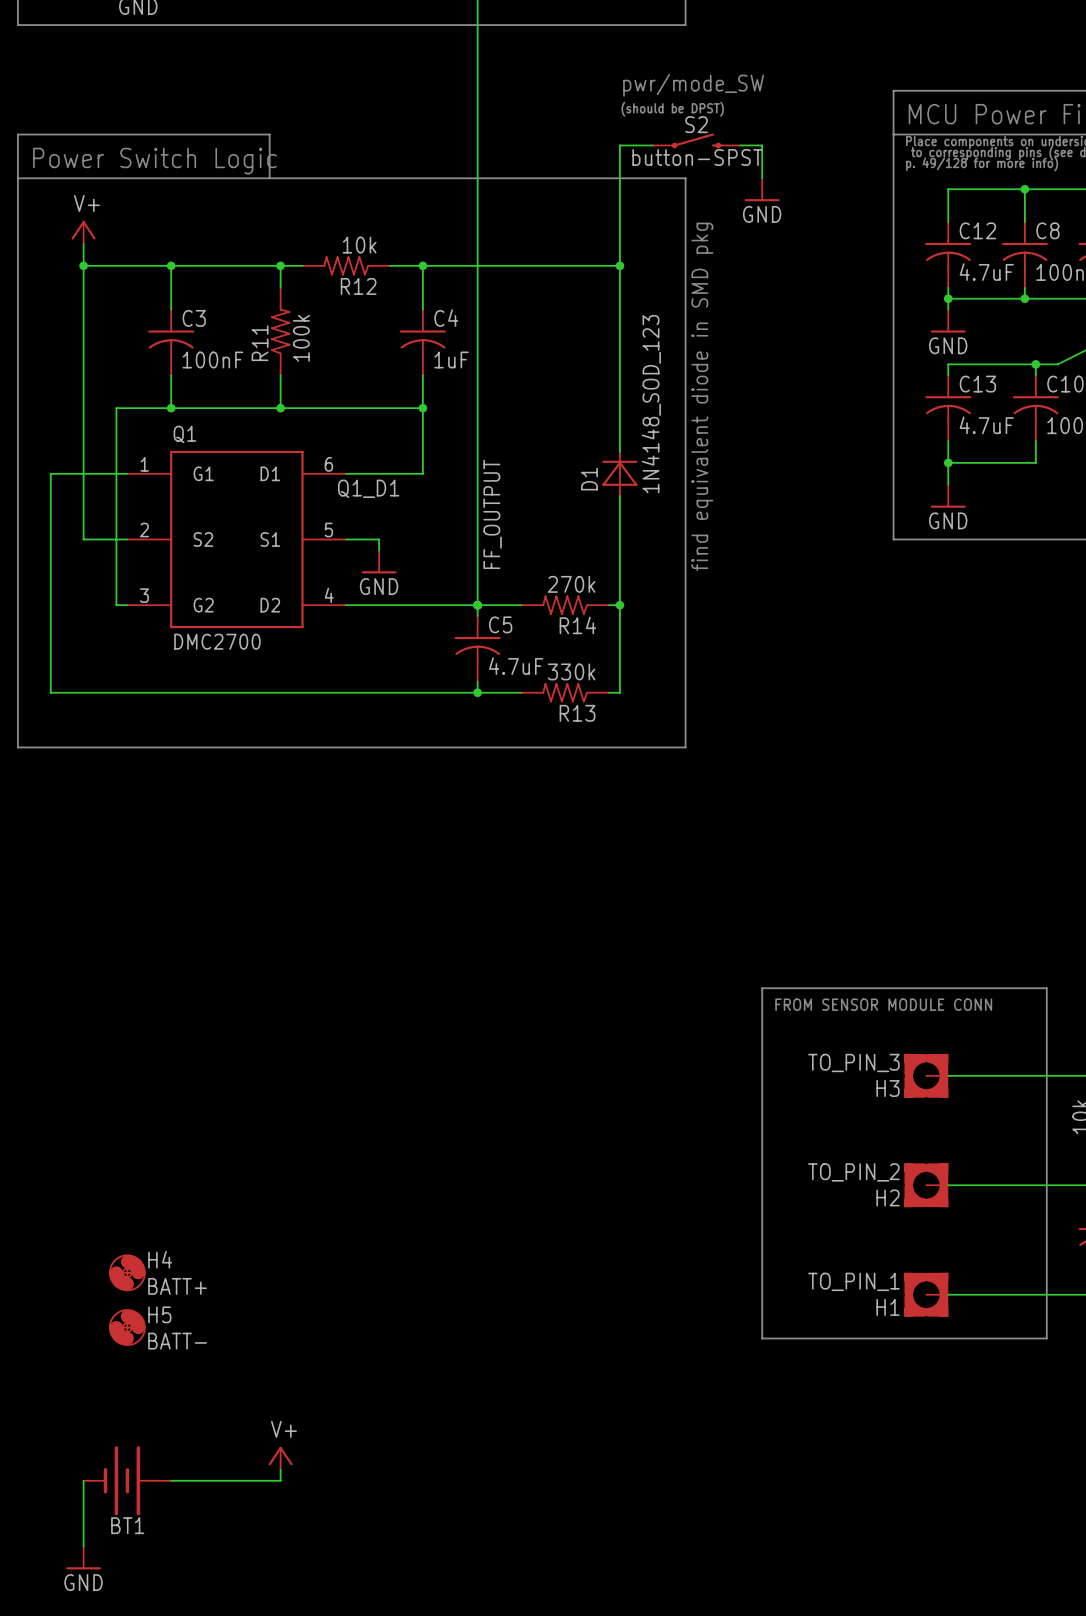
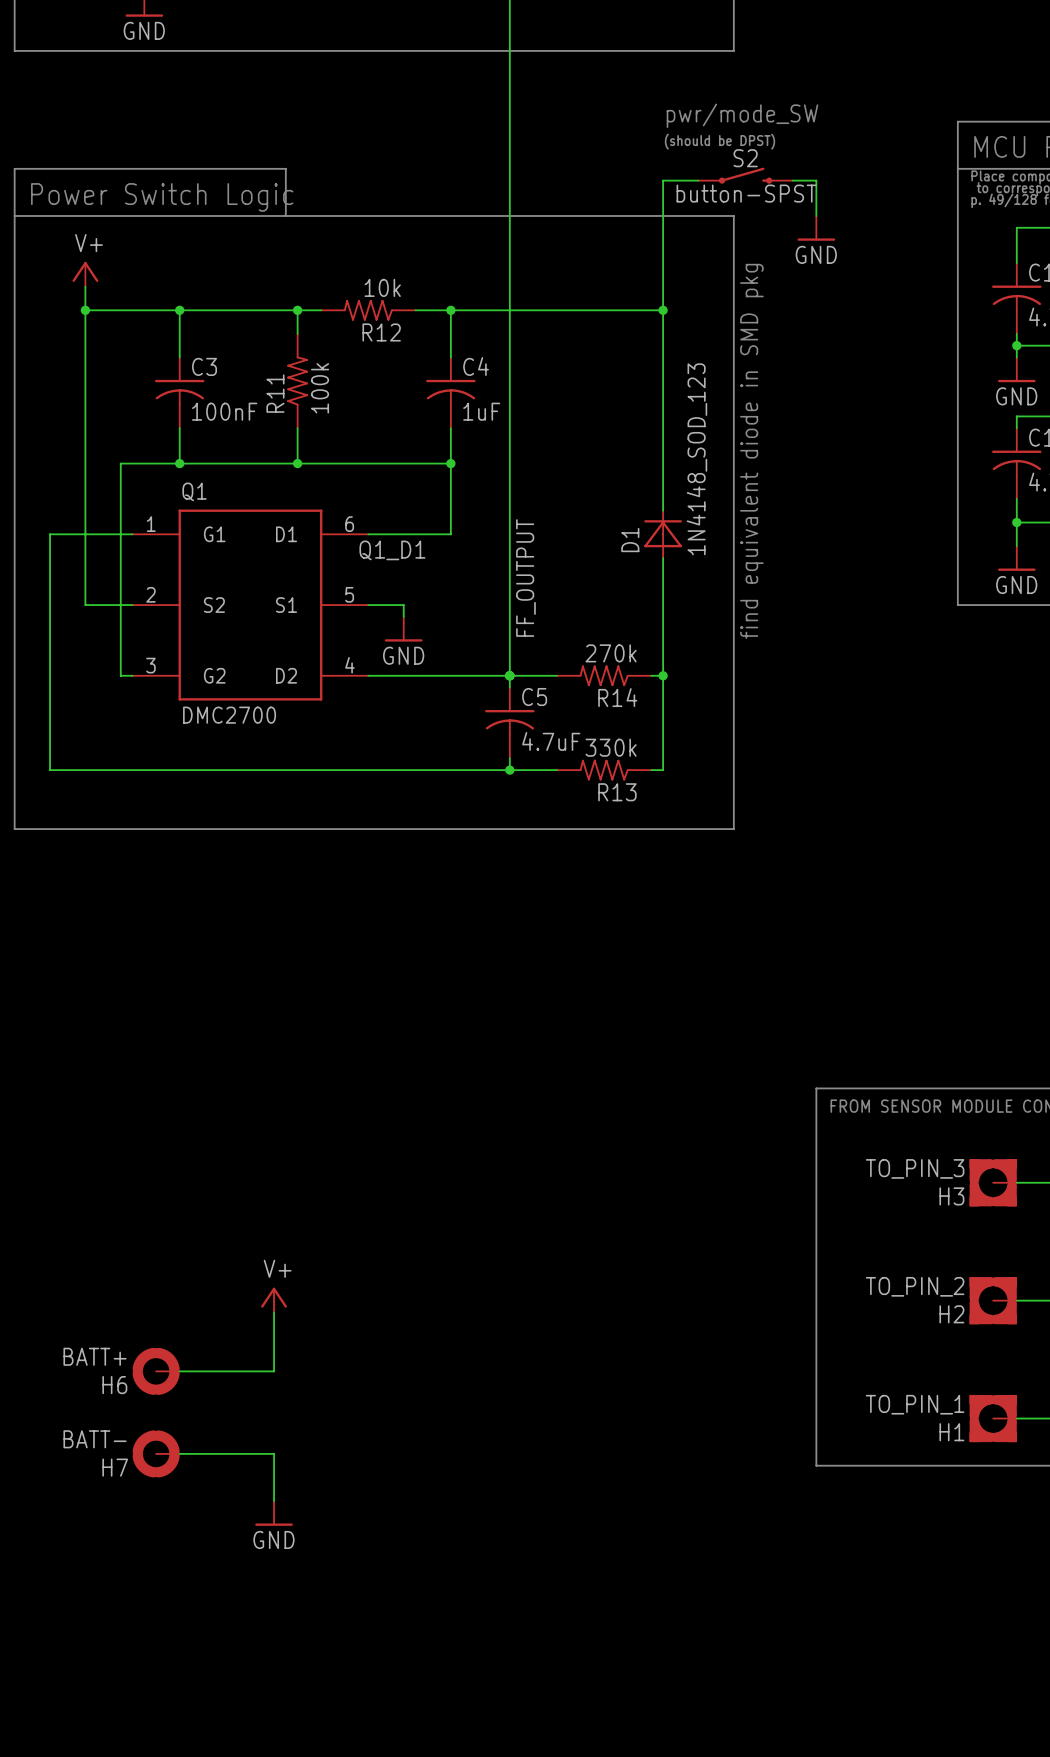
power symbol: none -> V+ (274, 1300)
wire: none -> (274, 1312) (274, 1371) (179, 1371)
H6: none -> BATT+ (156, 1371)
H4: BATT+ (127, 1272) -> none
H5: BATT- (127, 1327) -> none
H7: none -> BATT- (156, 1453)
wire: none -> (179, 1453) (274, 1453) (274, 1501)
power symbol: none -> GND (274, 1513)
power symbol: V+ (280, 1458) -> none
wire: (280, 1469) (280, 1480) (171, 1480) -> none
wire: (83, 1480) (83, 1546) -> none
BT1: (127, 1480) -> none
power symbol: GND (83, 1557) -> none

